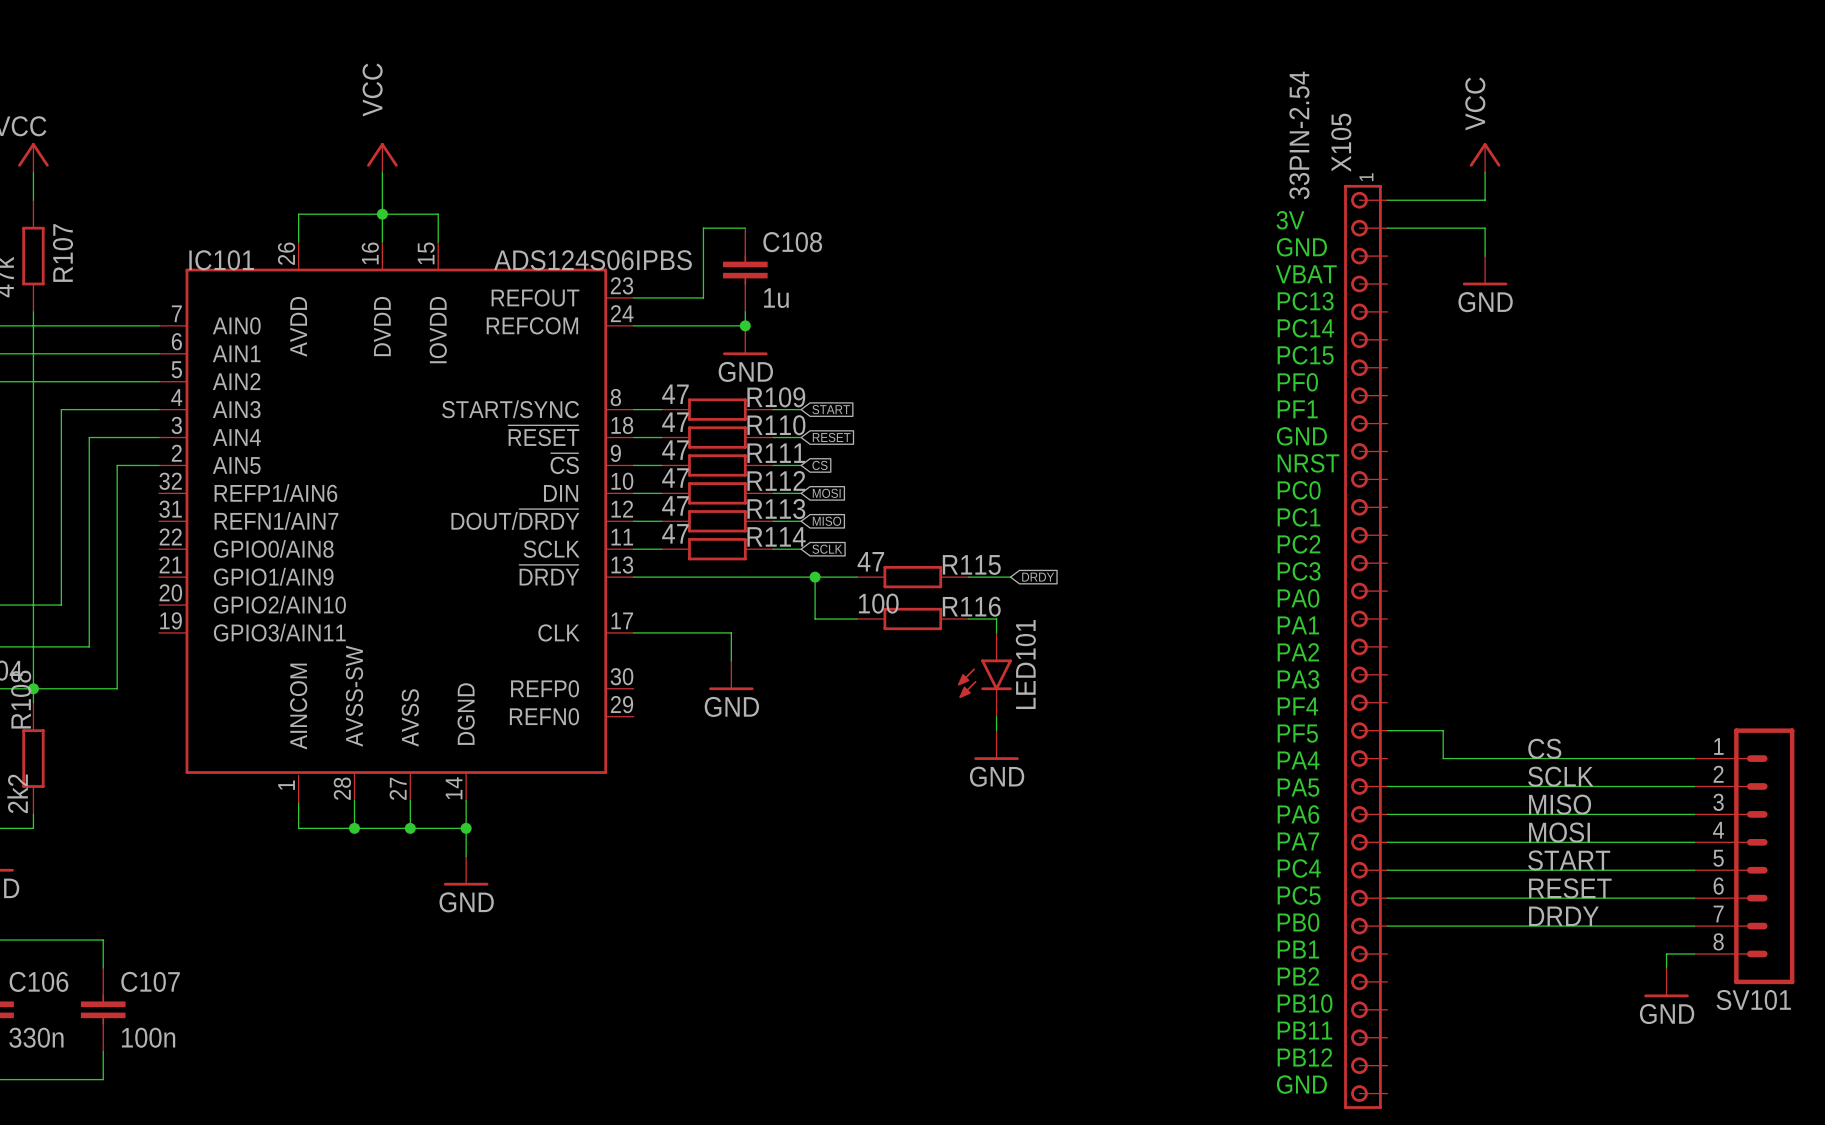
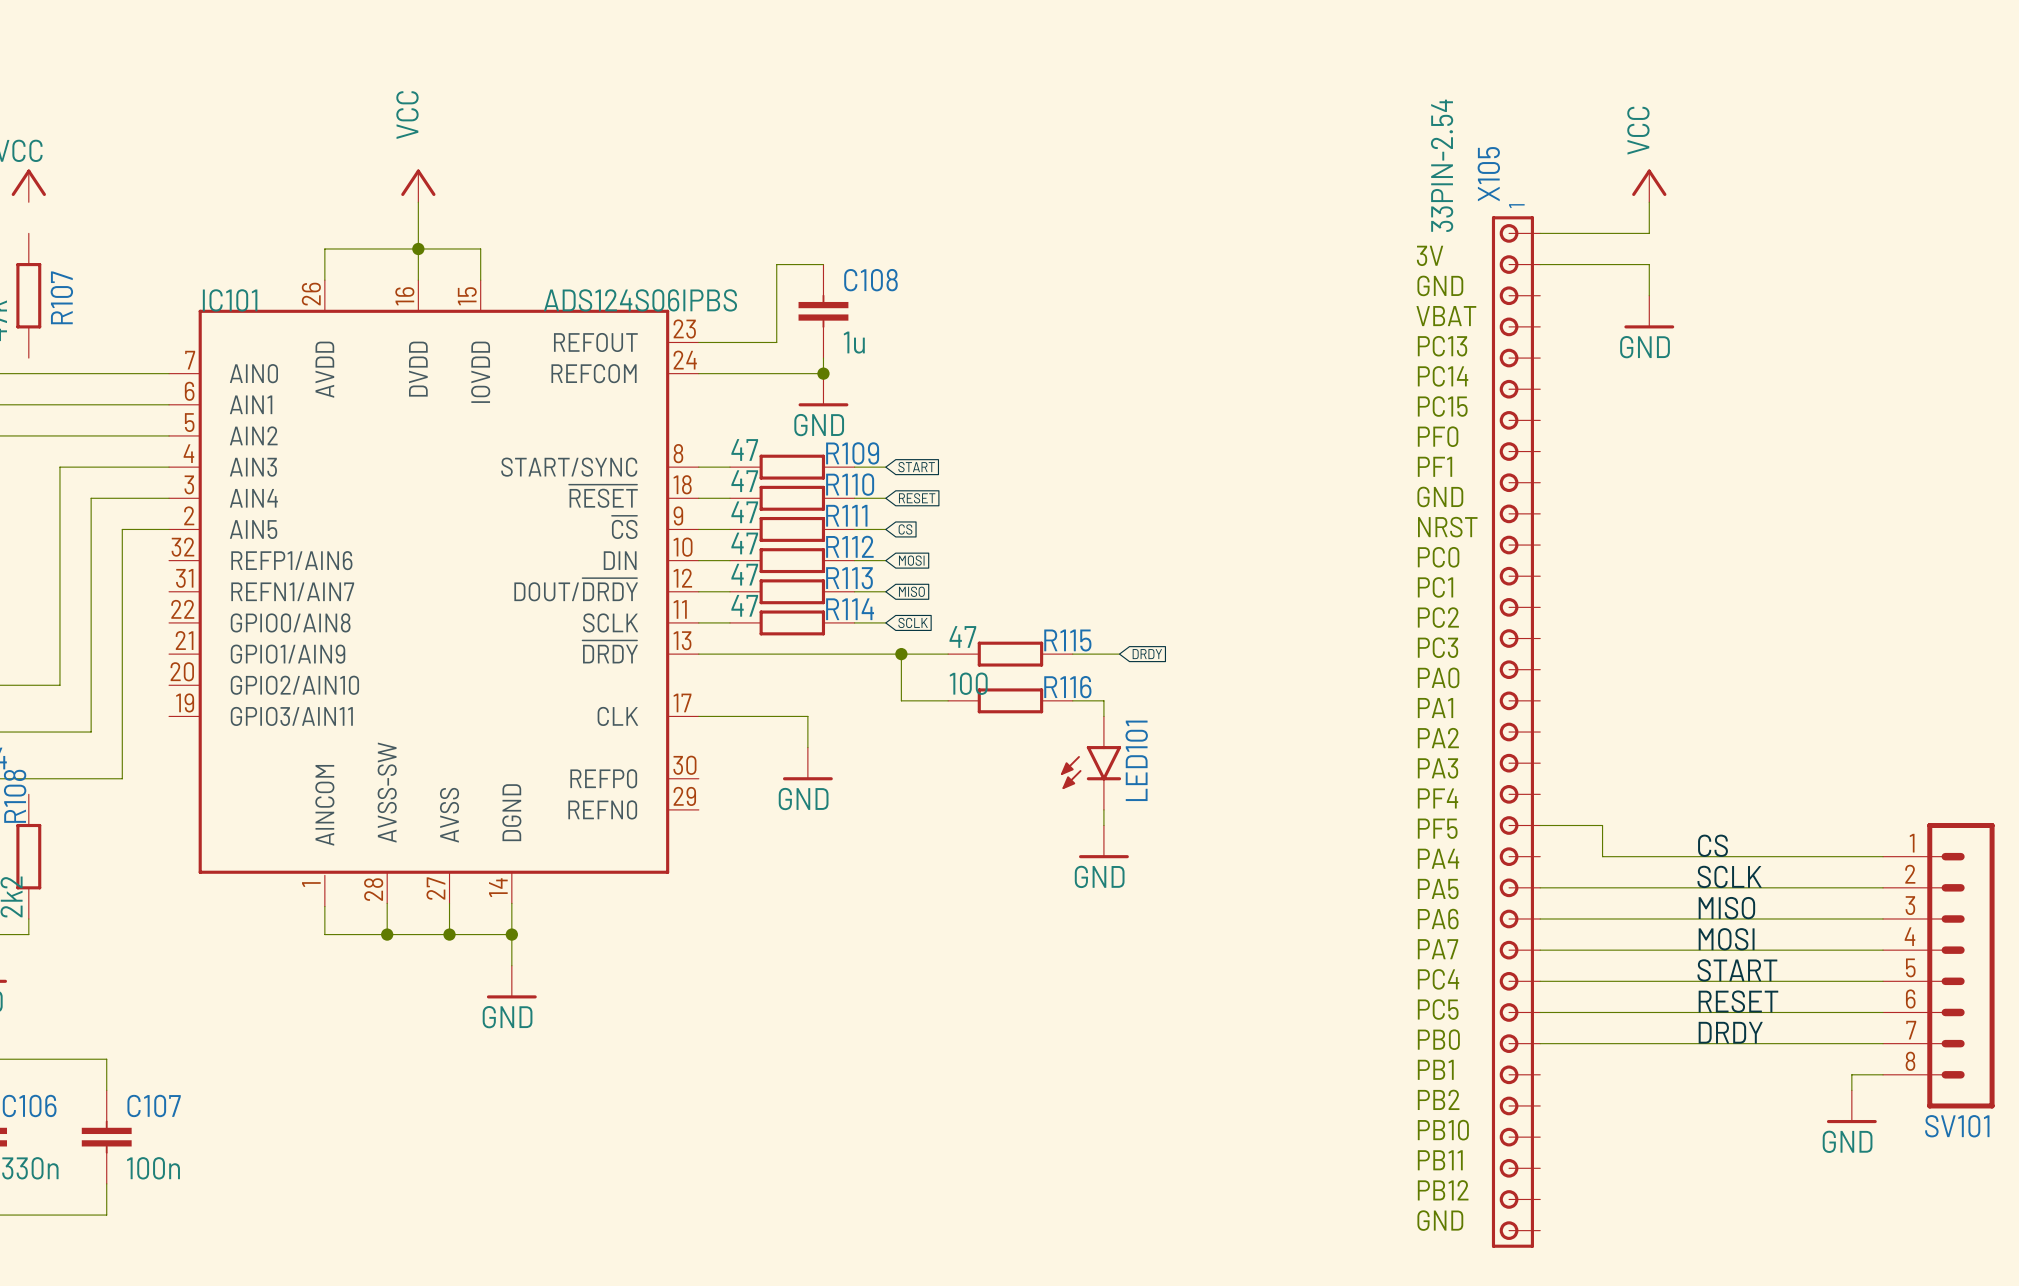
wire: (33, 172) (33, 200) -> none
wire: (33, 311) (33, 702) -> none
junction: (33, 688) -> none

